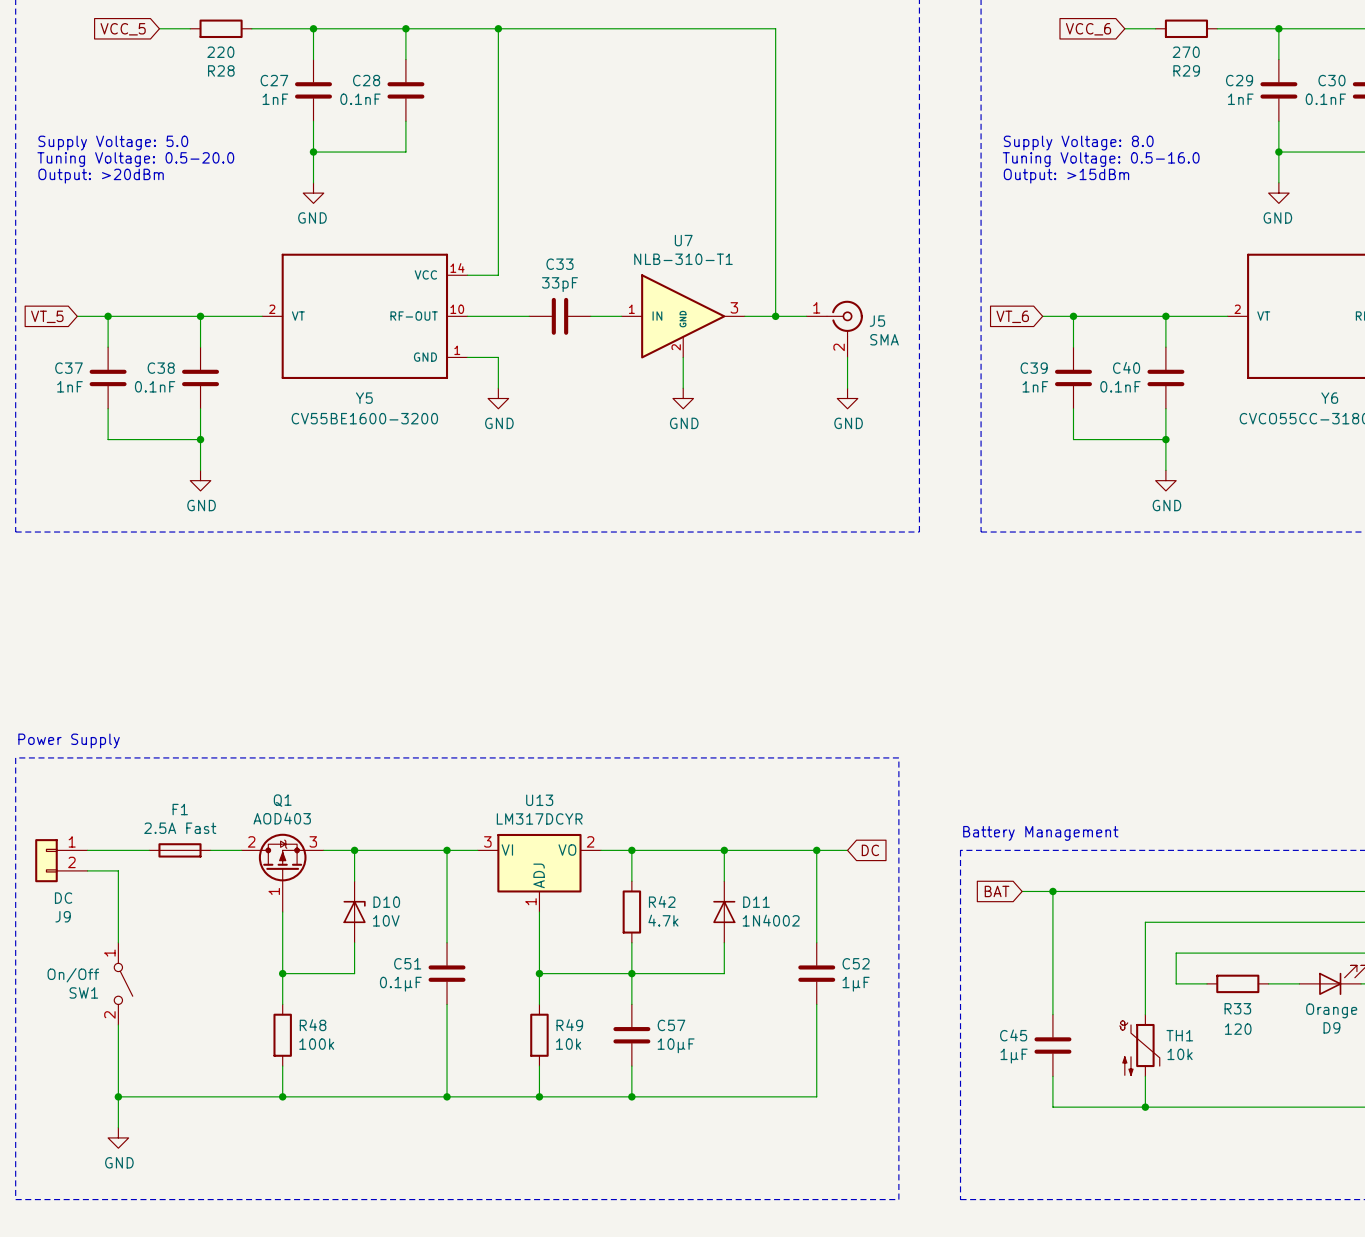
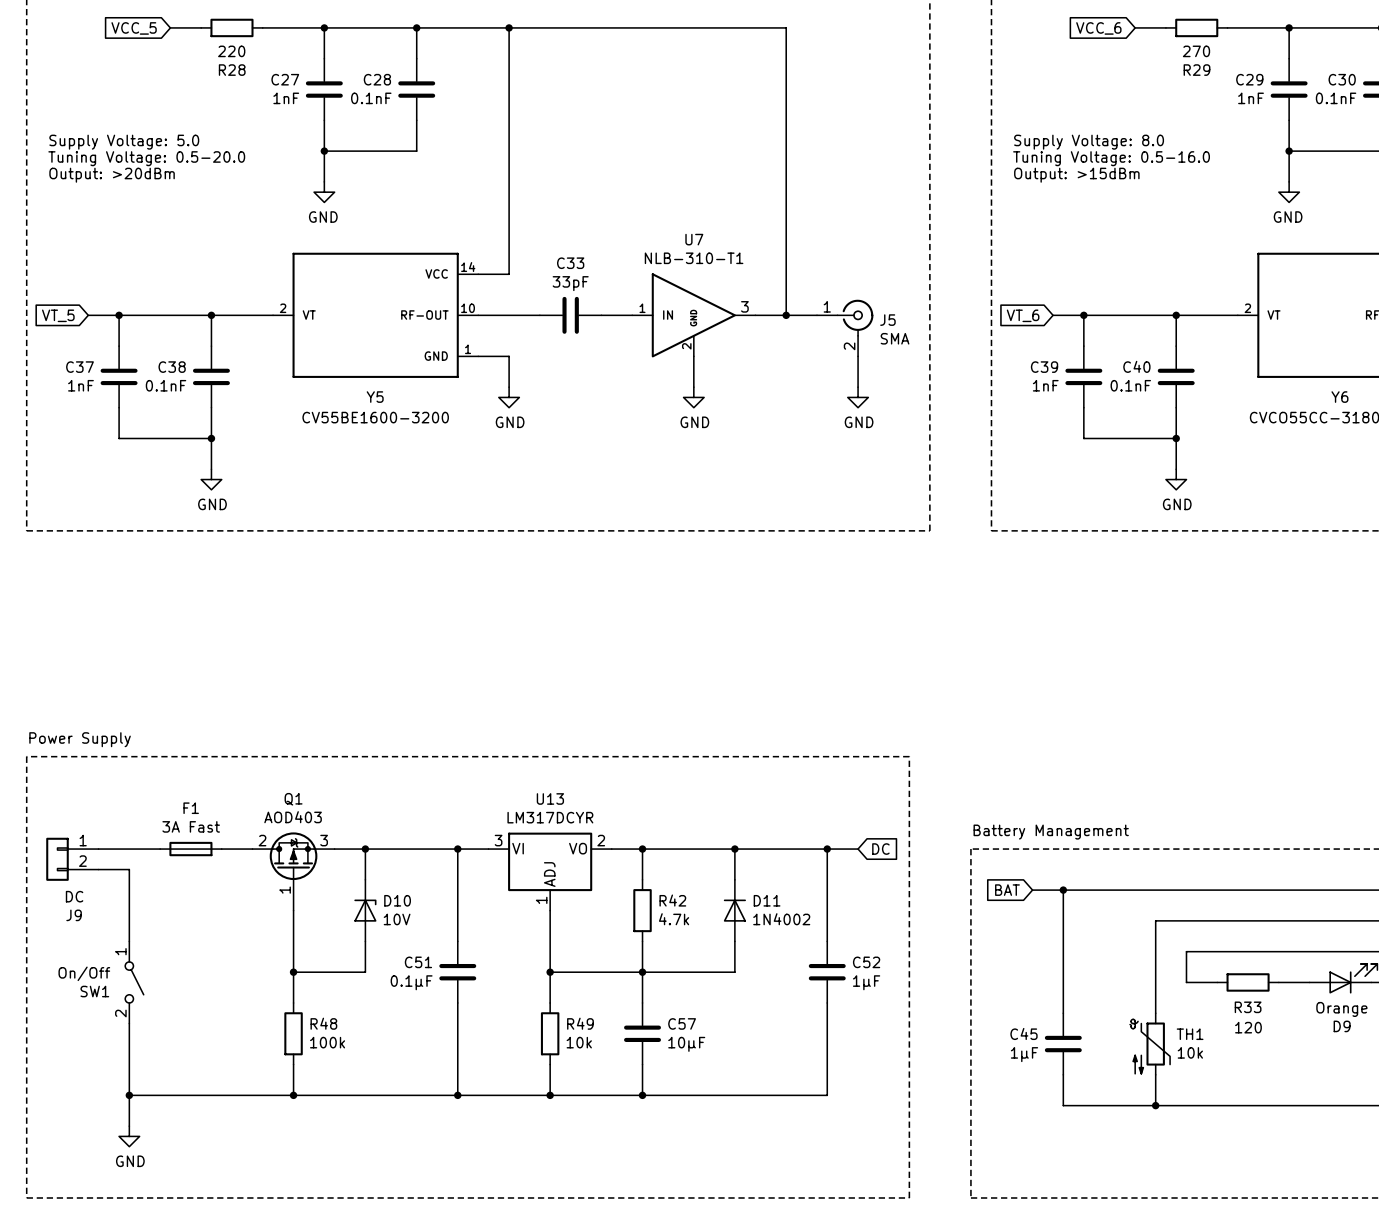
F1 value: 2.5A Fast (180, 828) -> 3A Fast (191, 826)

